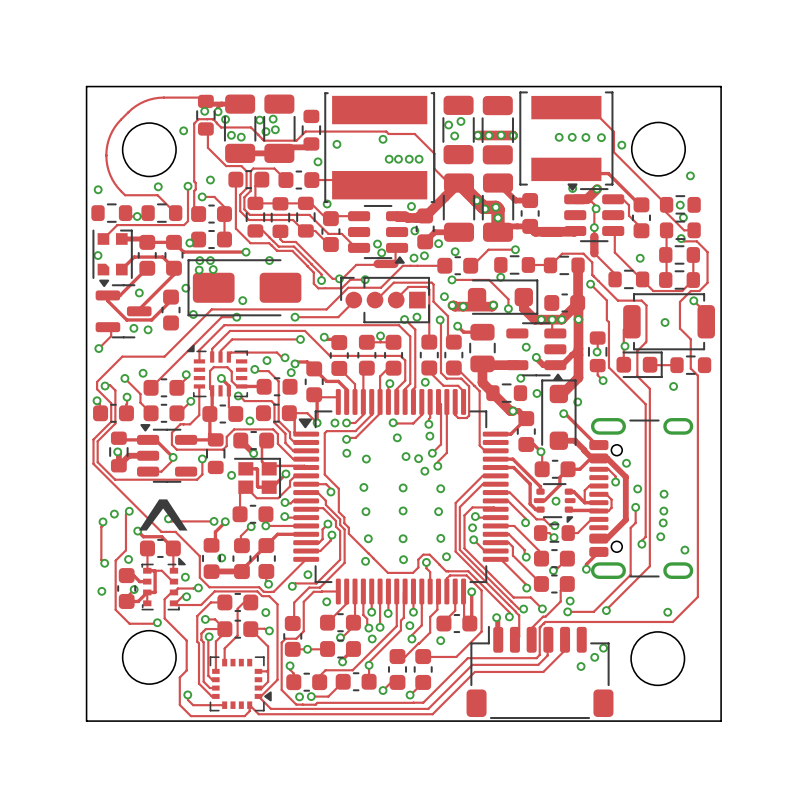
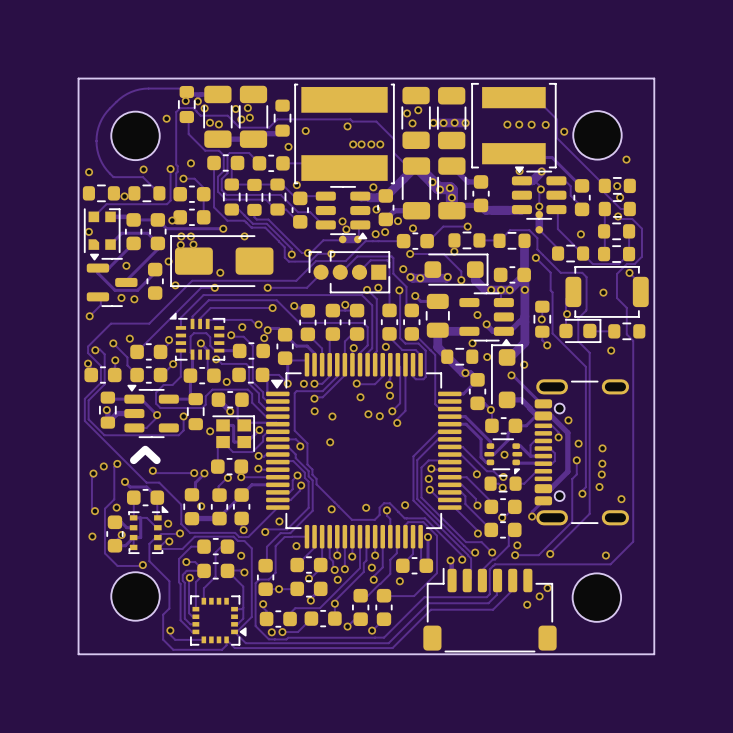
via: (424, 471) -> none
via: (403, 487) -> none
via: (440, 488) -> none
via: (403, 510) -> none
via: (365, 511) -> none
via: (438, 511) -> none
via: (368, 538) -> none
via: (403, 538) -> none
via: (440, 538) -> none

